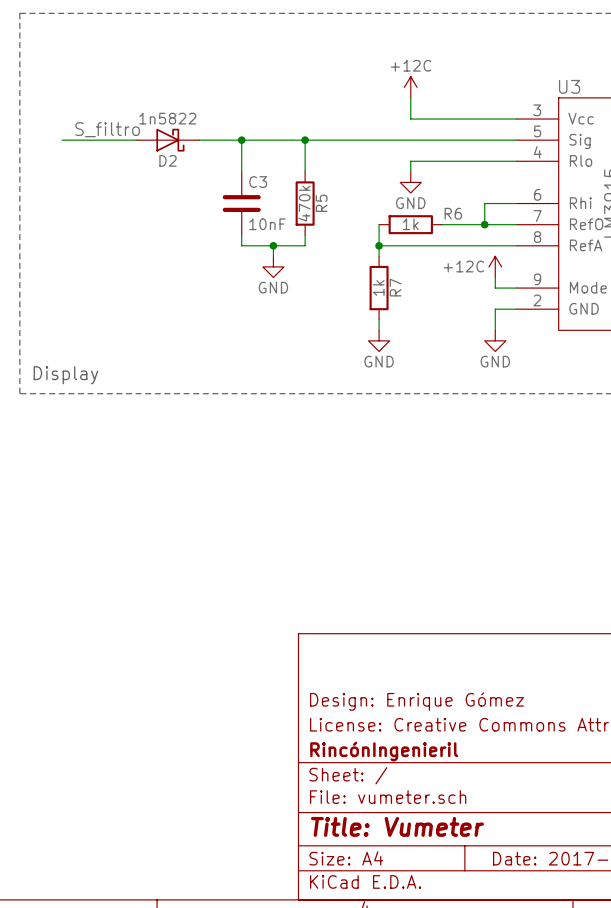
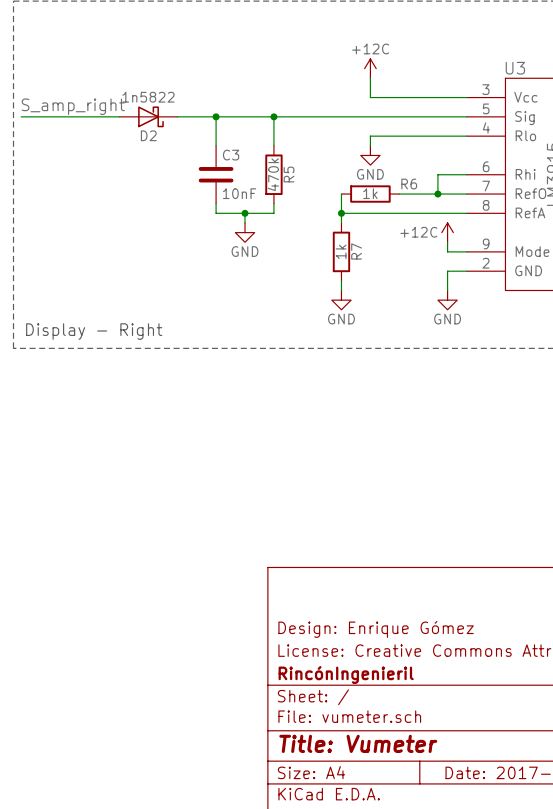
label: none -> S_amp_right (73, 106)
label: S_filtro (107, 129) -> none
wire: none -> (21, 116) (52, 116)
text: Display (65, 375) -> Display - Right (94, 331)

